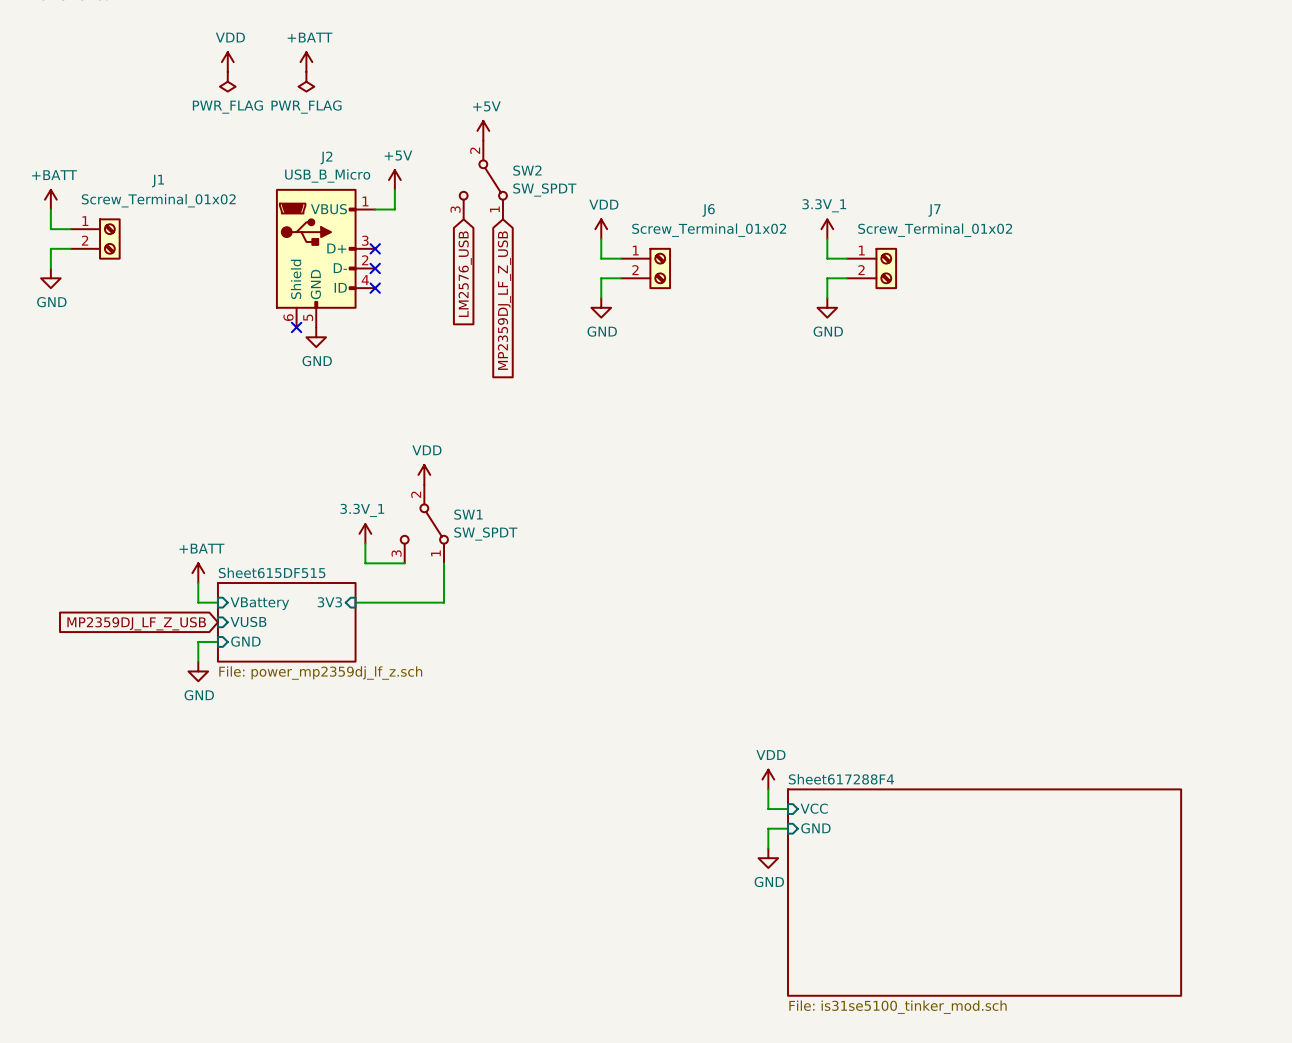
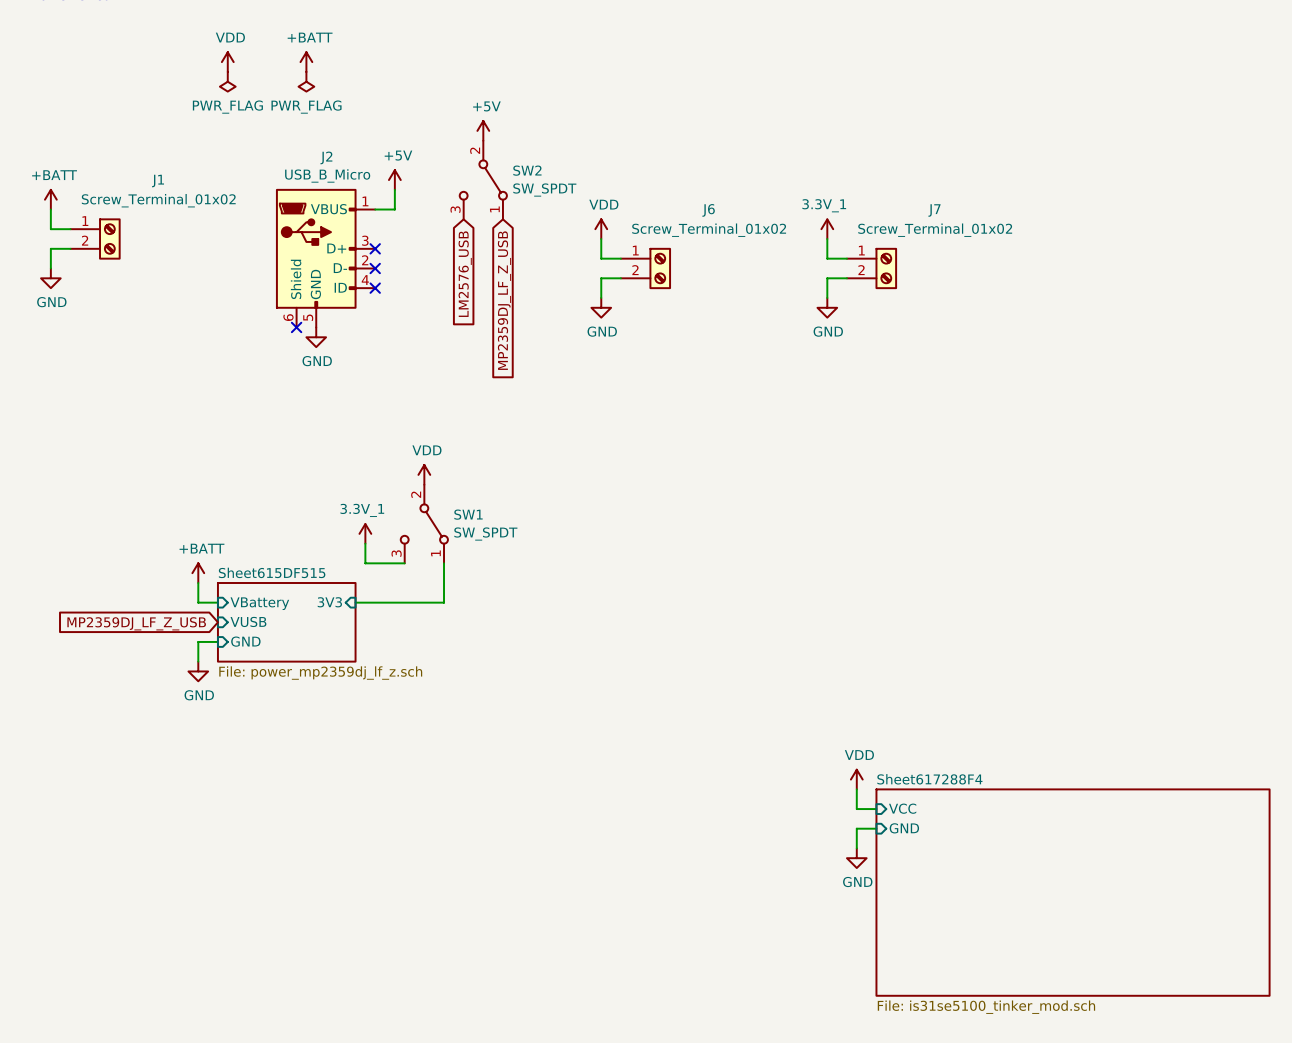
power symbol position: VDD (768, 779) -> VDD (856, 779)
wire: (768, 789) (768, 809) (788, 809) -> (856, 789) (856, 809) (876, 809)
sheet pin position: VCC (814, 808) -> VCC (902, 808)
wire: (788, 828) (768, 828) (768, 848) -> (876, 828) (856, 828) (856, 848)
sheet pin position: GND (815, 828) -> GND (904, 828)
power symbol position: GND (768, 858) -> GND (856, 858)
sheet Sheet617288F4 position: (984, 892) -> (1073, 892)

